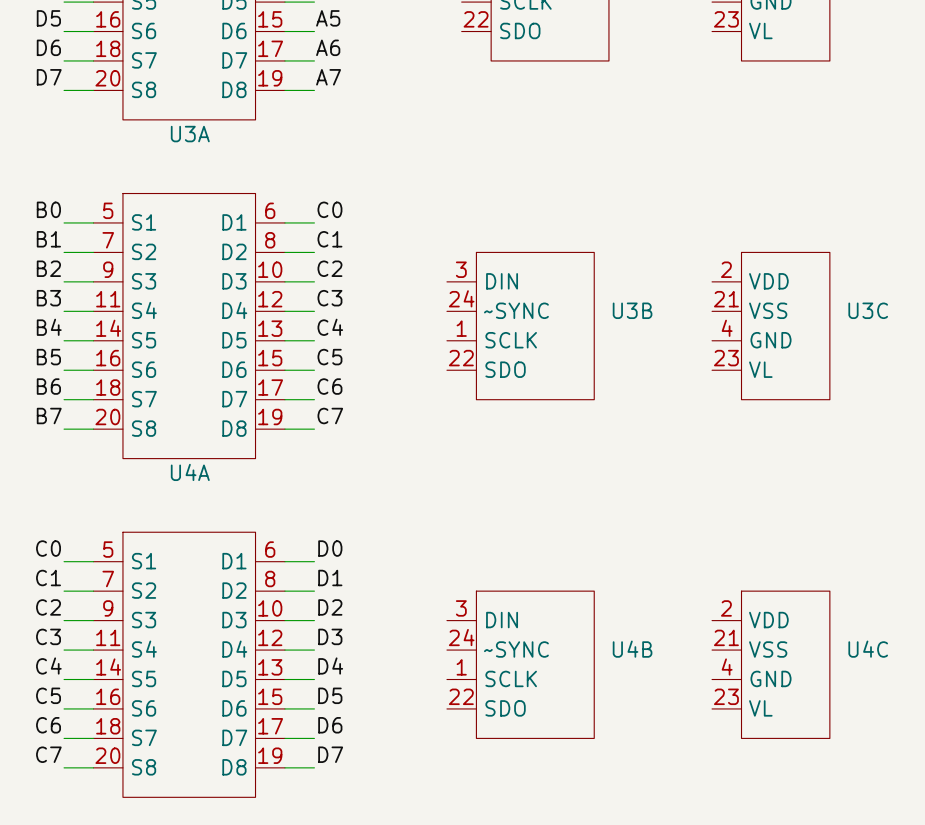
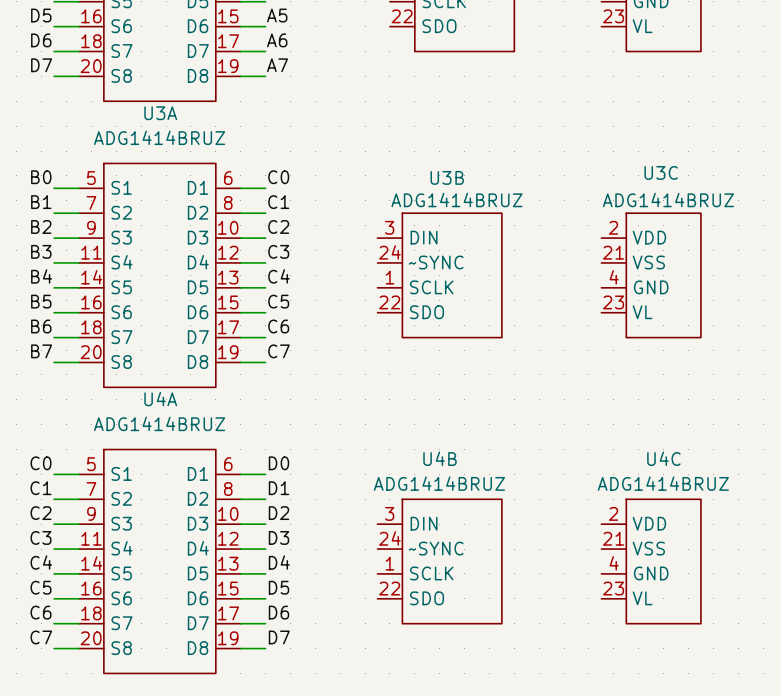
U3A value: none -> ADG1414BRUZ (159, 137)
U3B value: none -> ADG1414BRUZ (456, 200)
U3C value: none -> ADG1414BRUZ (668, 200)
U3B name position: U3B (632, 310) -> U3B (447, 177)
U3C name position: U3C (868, 310) -> U3C (661, 172)
U4A value: none -> ADG1414BRUZ (159, 423)
U4B value: none -> ADG1414BRUZ (439, 483)
U4C value: none -> ADG1414BRUZ (663, 483)
U4B name position: U4B (632, 649) -> U4B (440, 458)
U4C name position: U4C (868, 649) -> U4C (663, 458)

